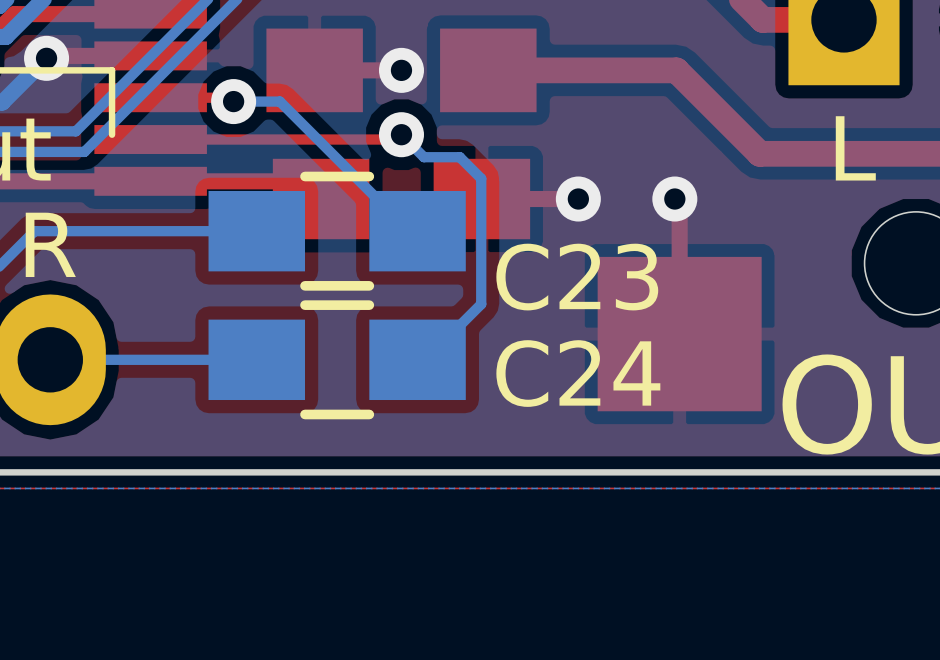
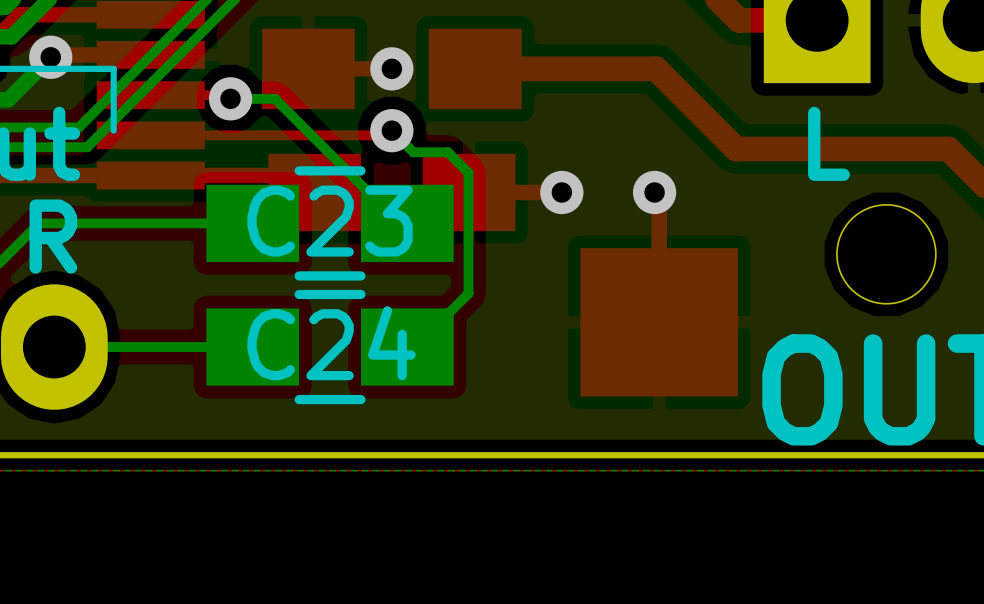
C23 name position: C23 (577, 277) -> C23 (330, 221)
C24 name position: C24 (578, 373) -> C24 (331, 343)

